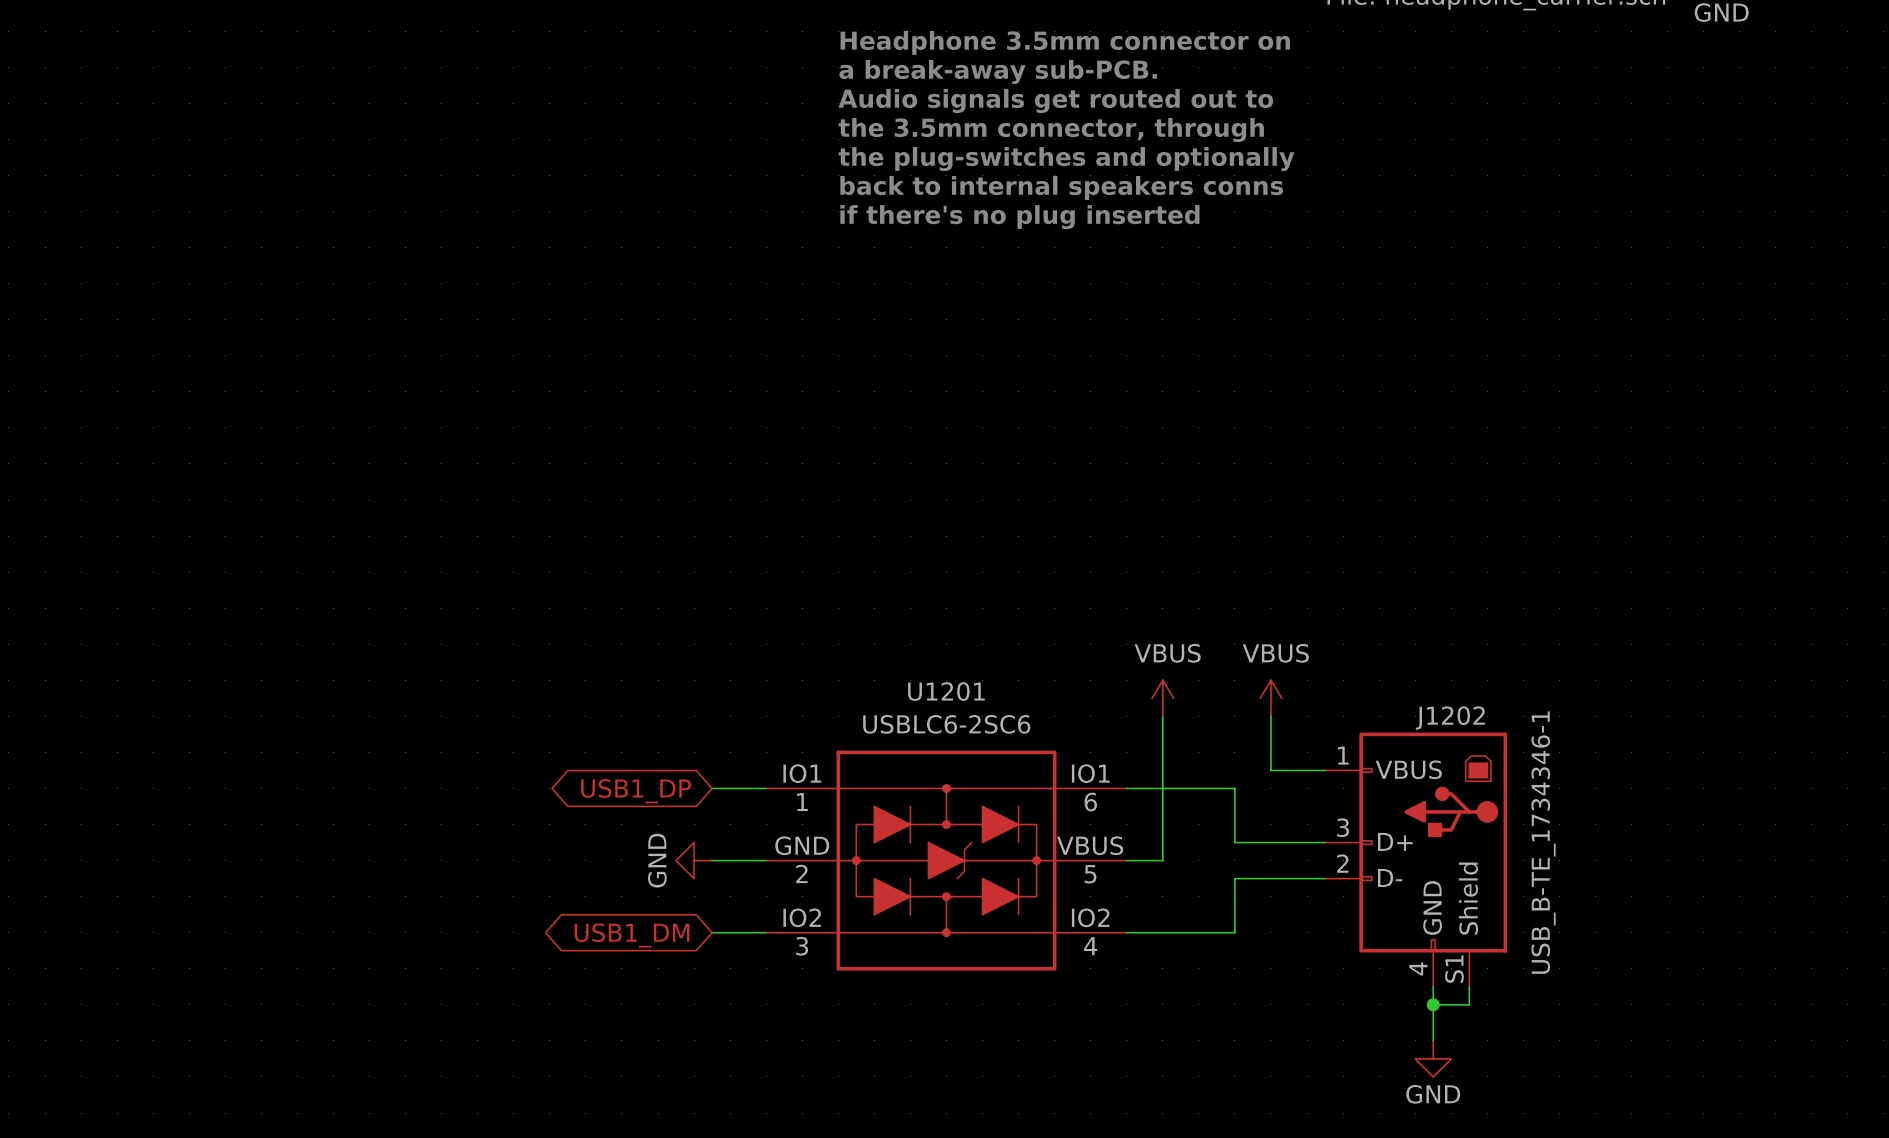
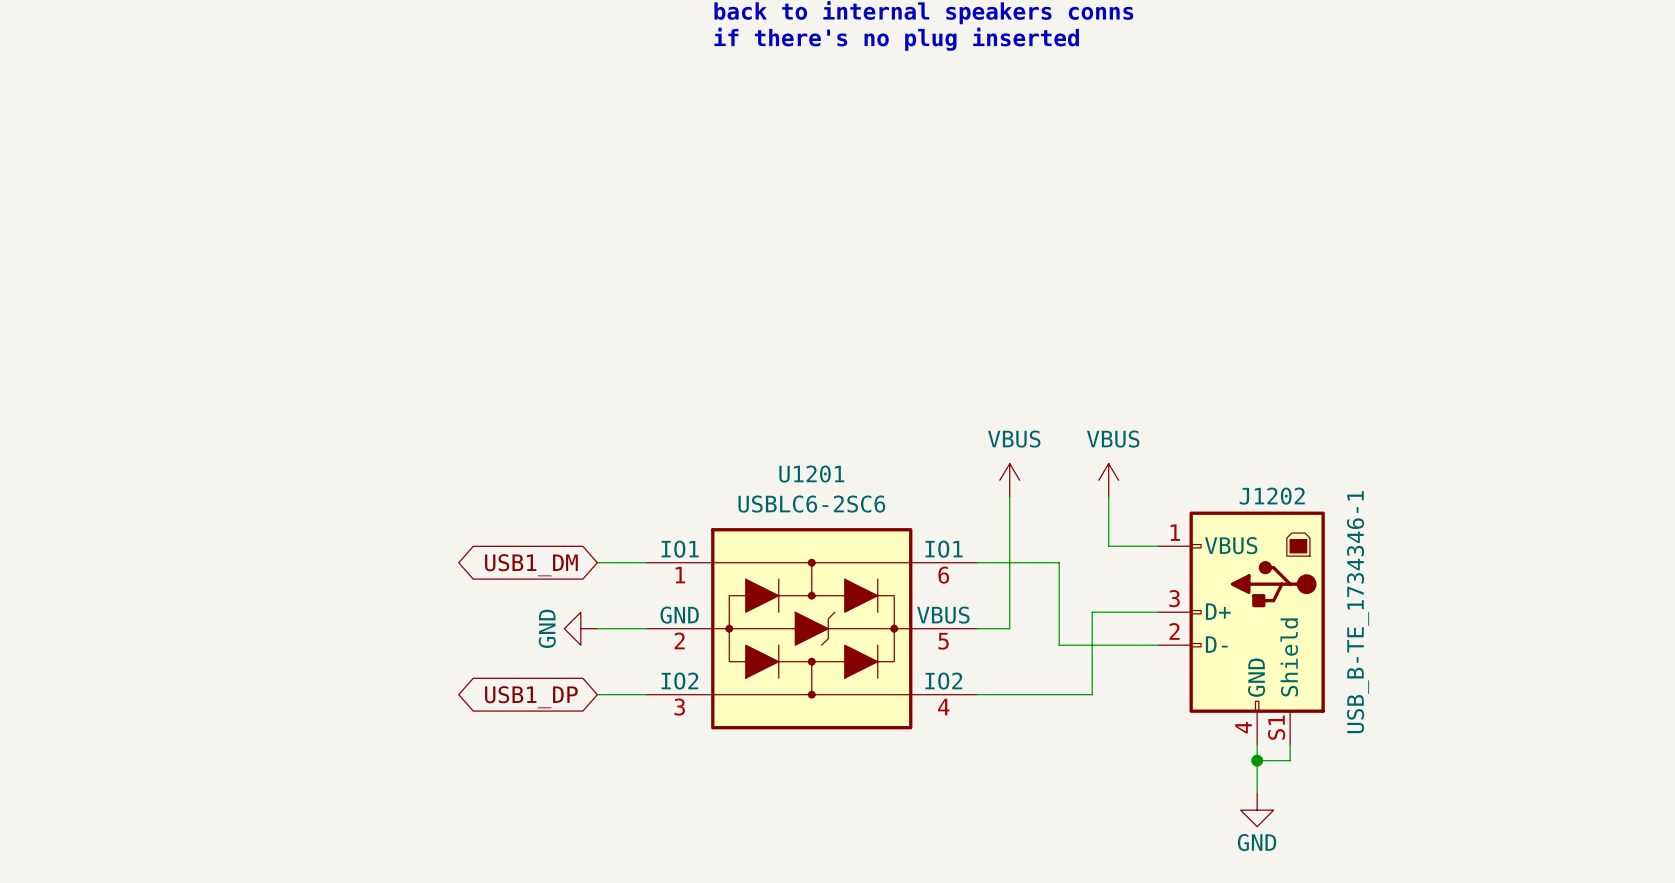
wire: (1216, 788) (1234, 788) (1234, 842) (1252, 842) -> (1059, 562) (1059, 645) (1075, 645)
global label: USB1_DP (636, 791) -> USB1_DM (531, 565)
wire: (1234, 878) (1234, 932) -> (1092, 612) (1092, 694) (1075, 694)
global label: USB1_DM (632, 935) -> USB1_DP (531, 697)

